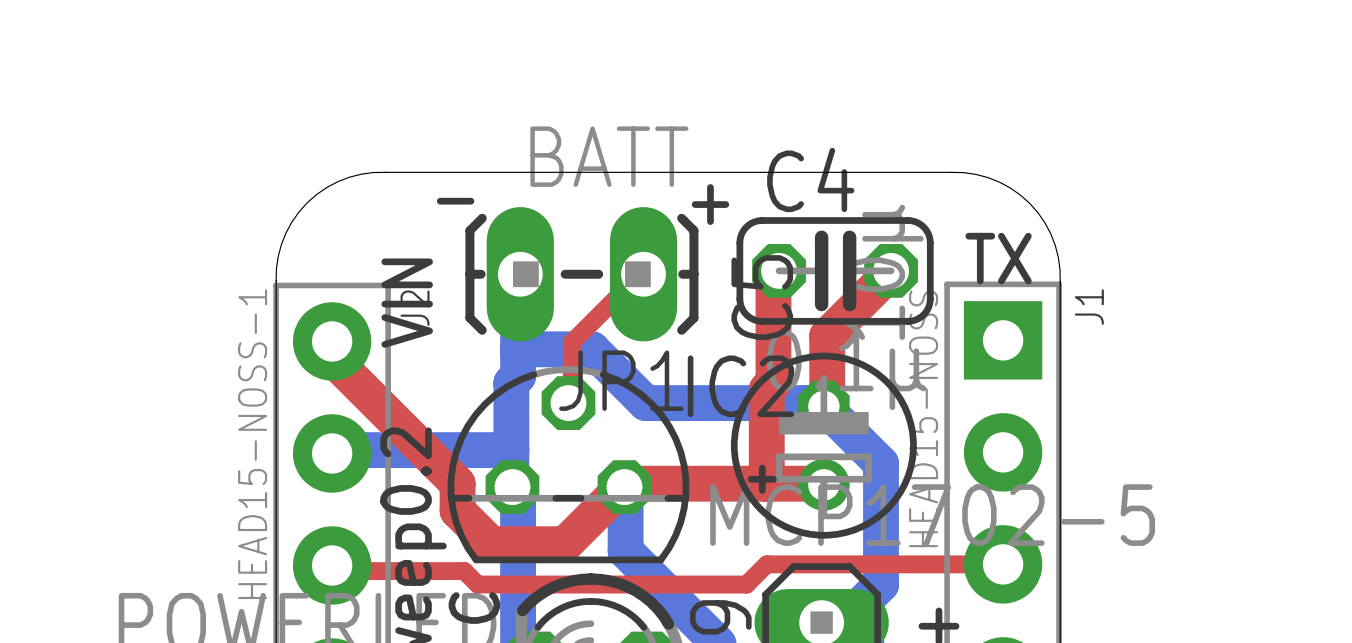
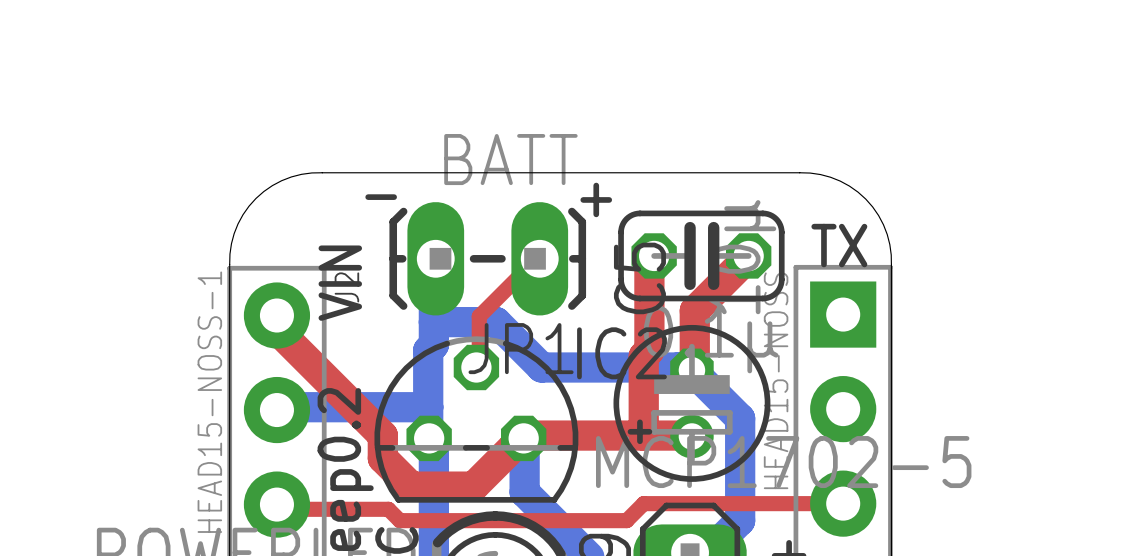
C4 name: C4 (810, 179) -> none
J1 name: J1 (1089, 307) -> none

